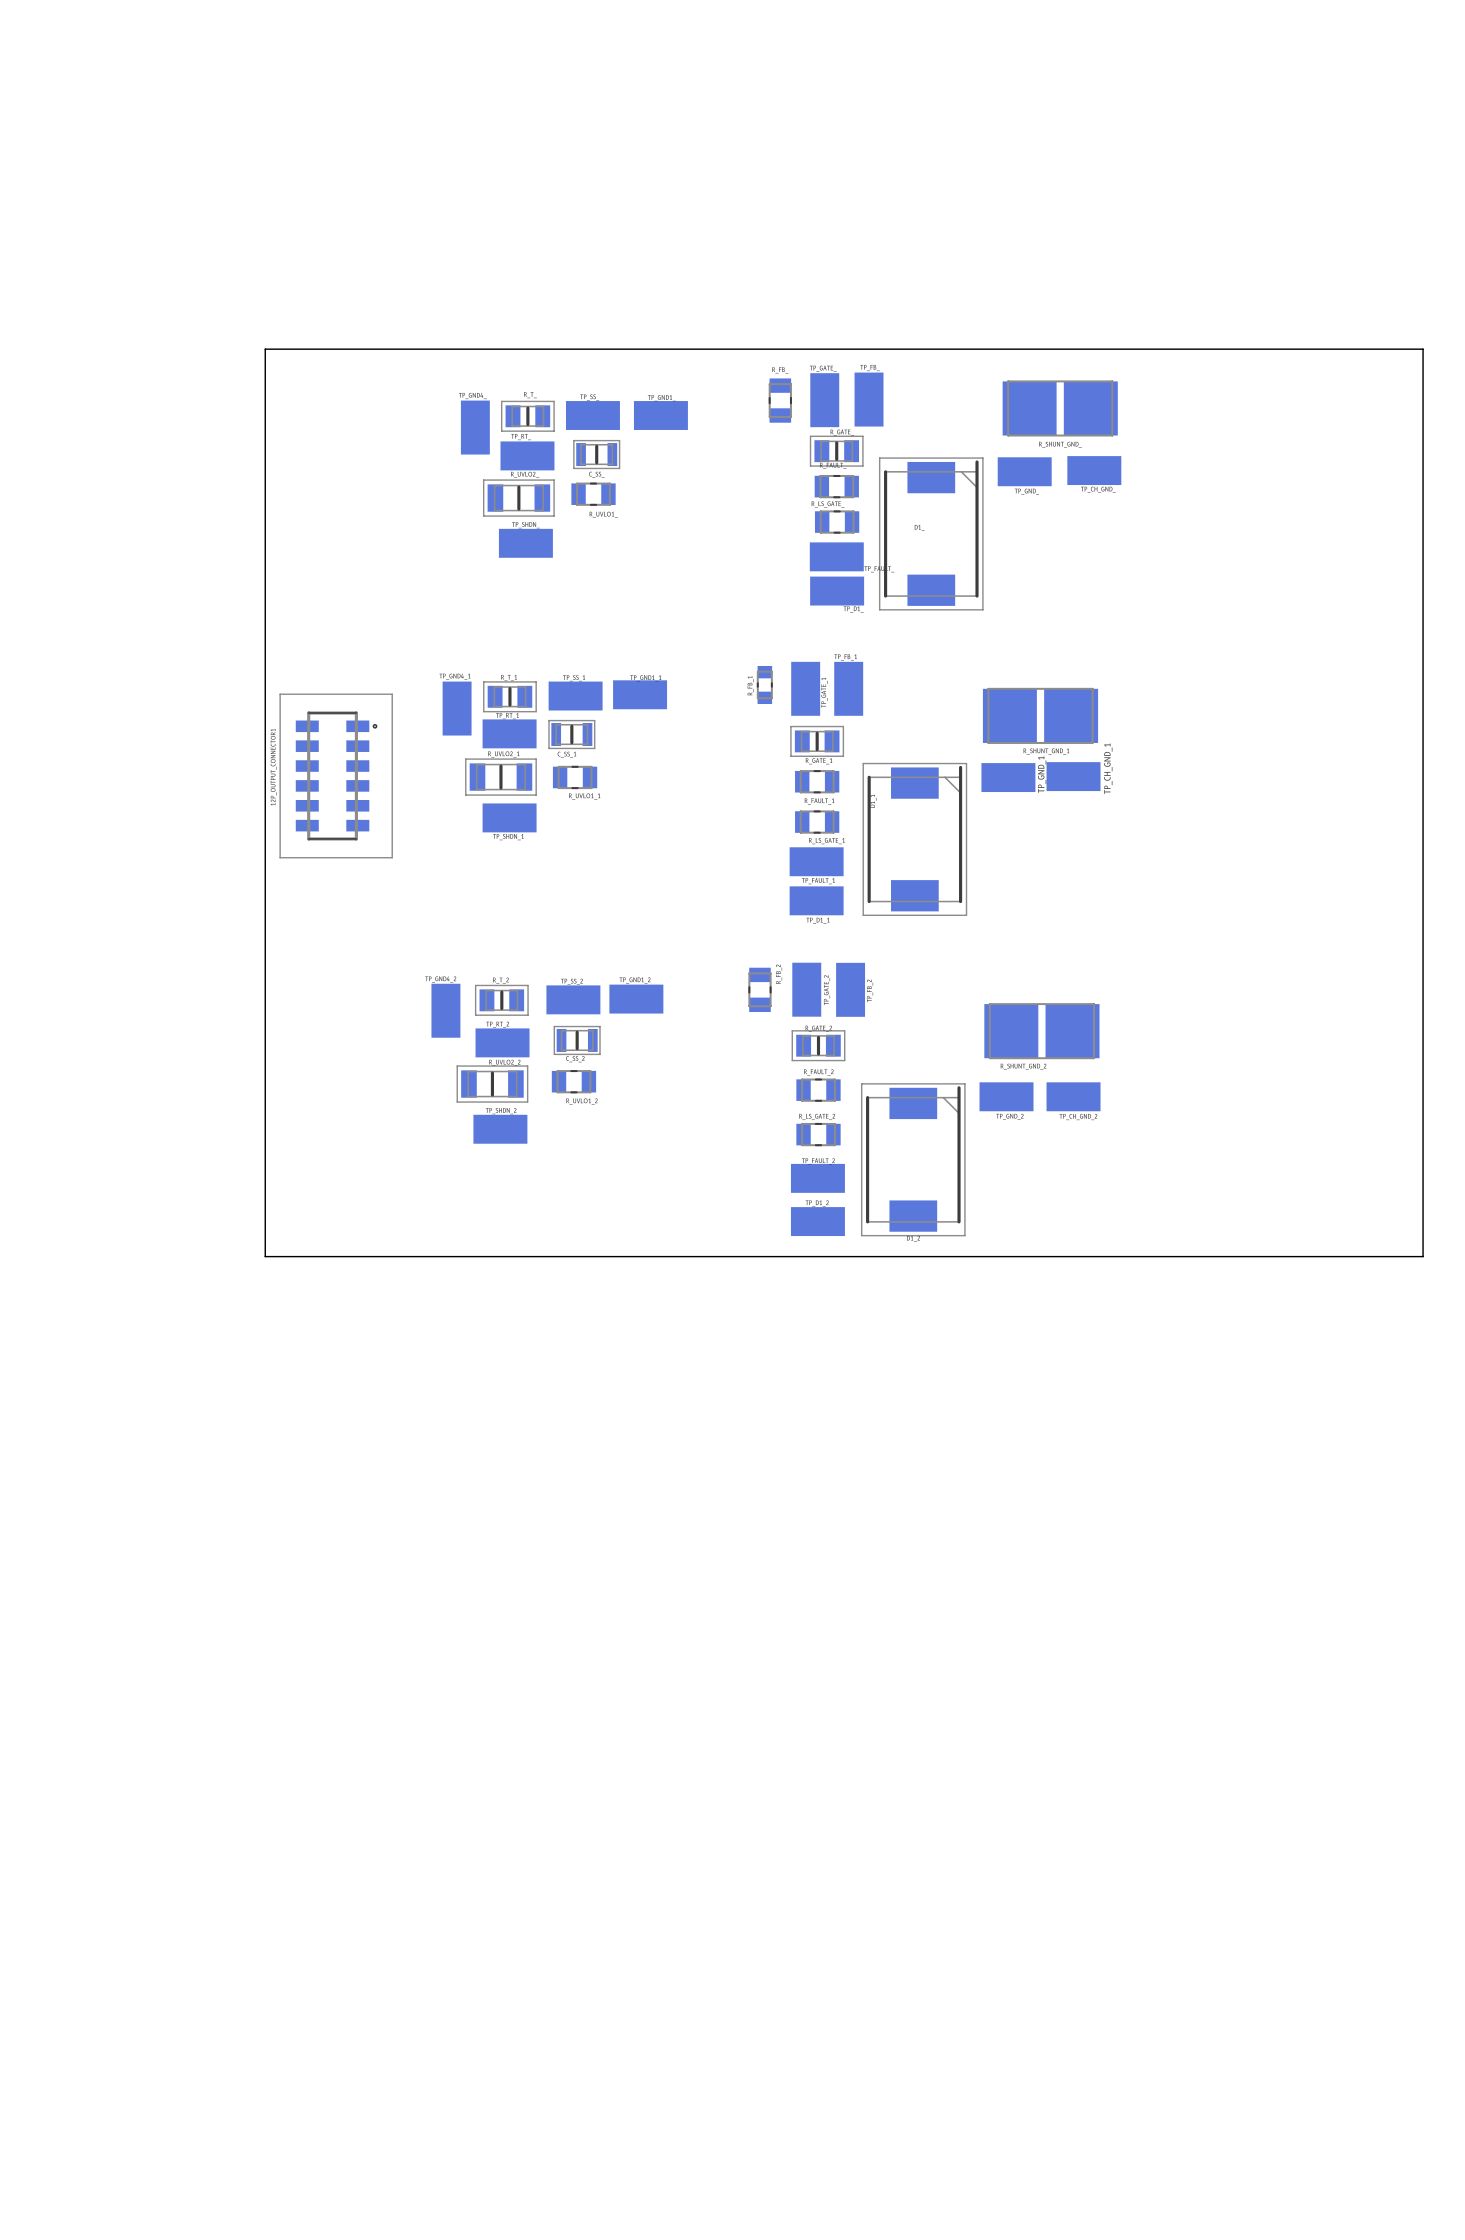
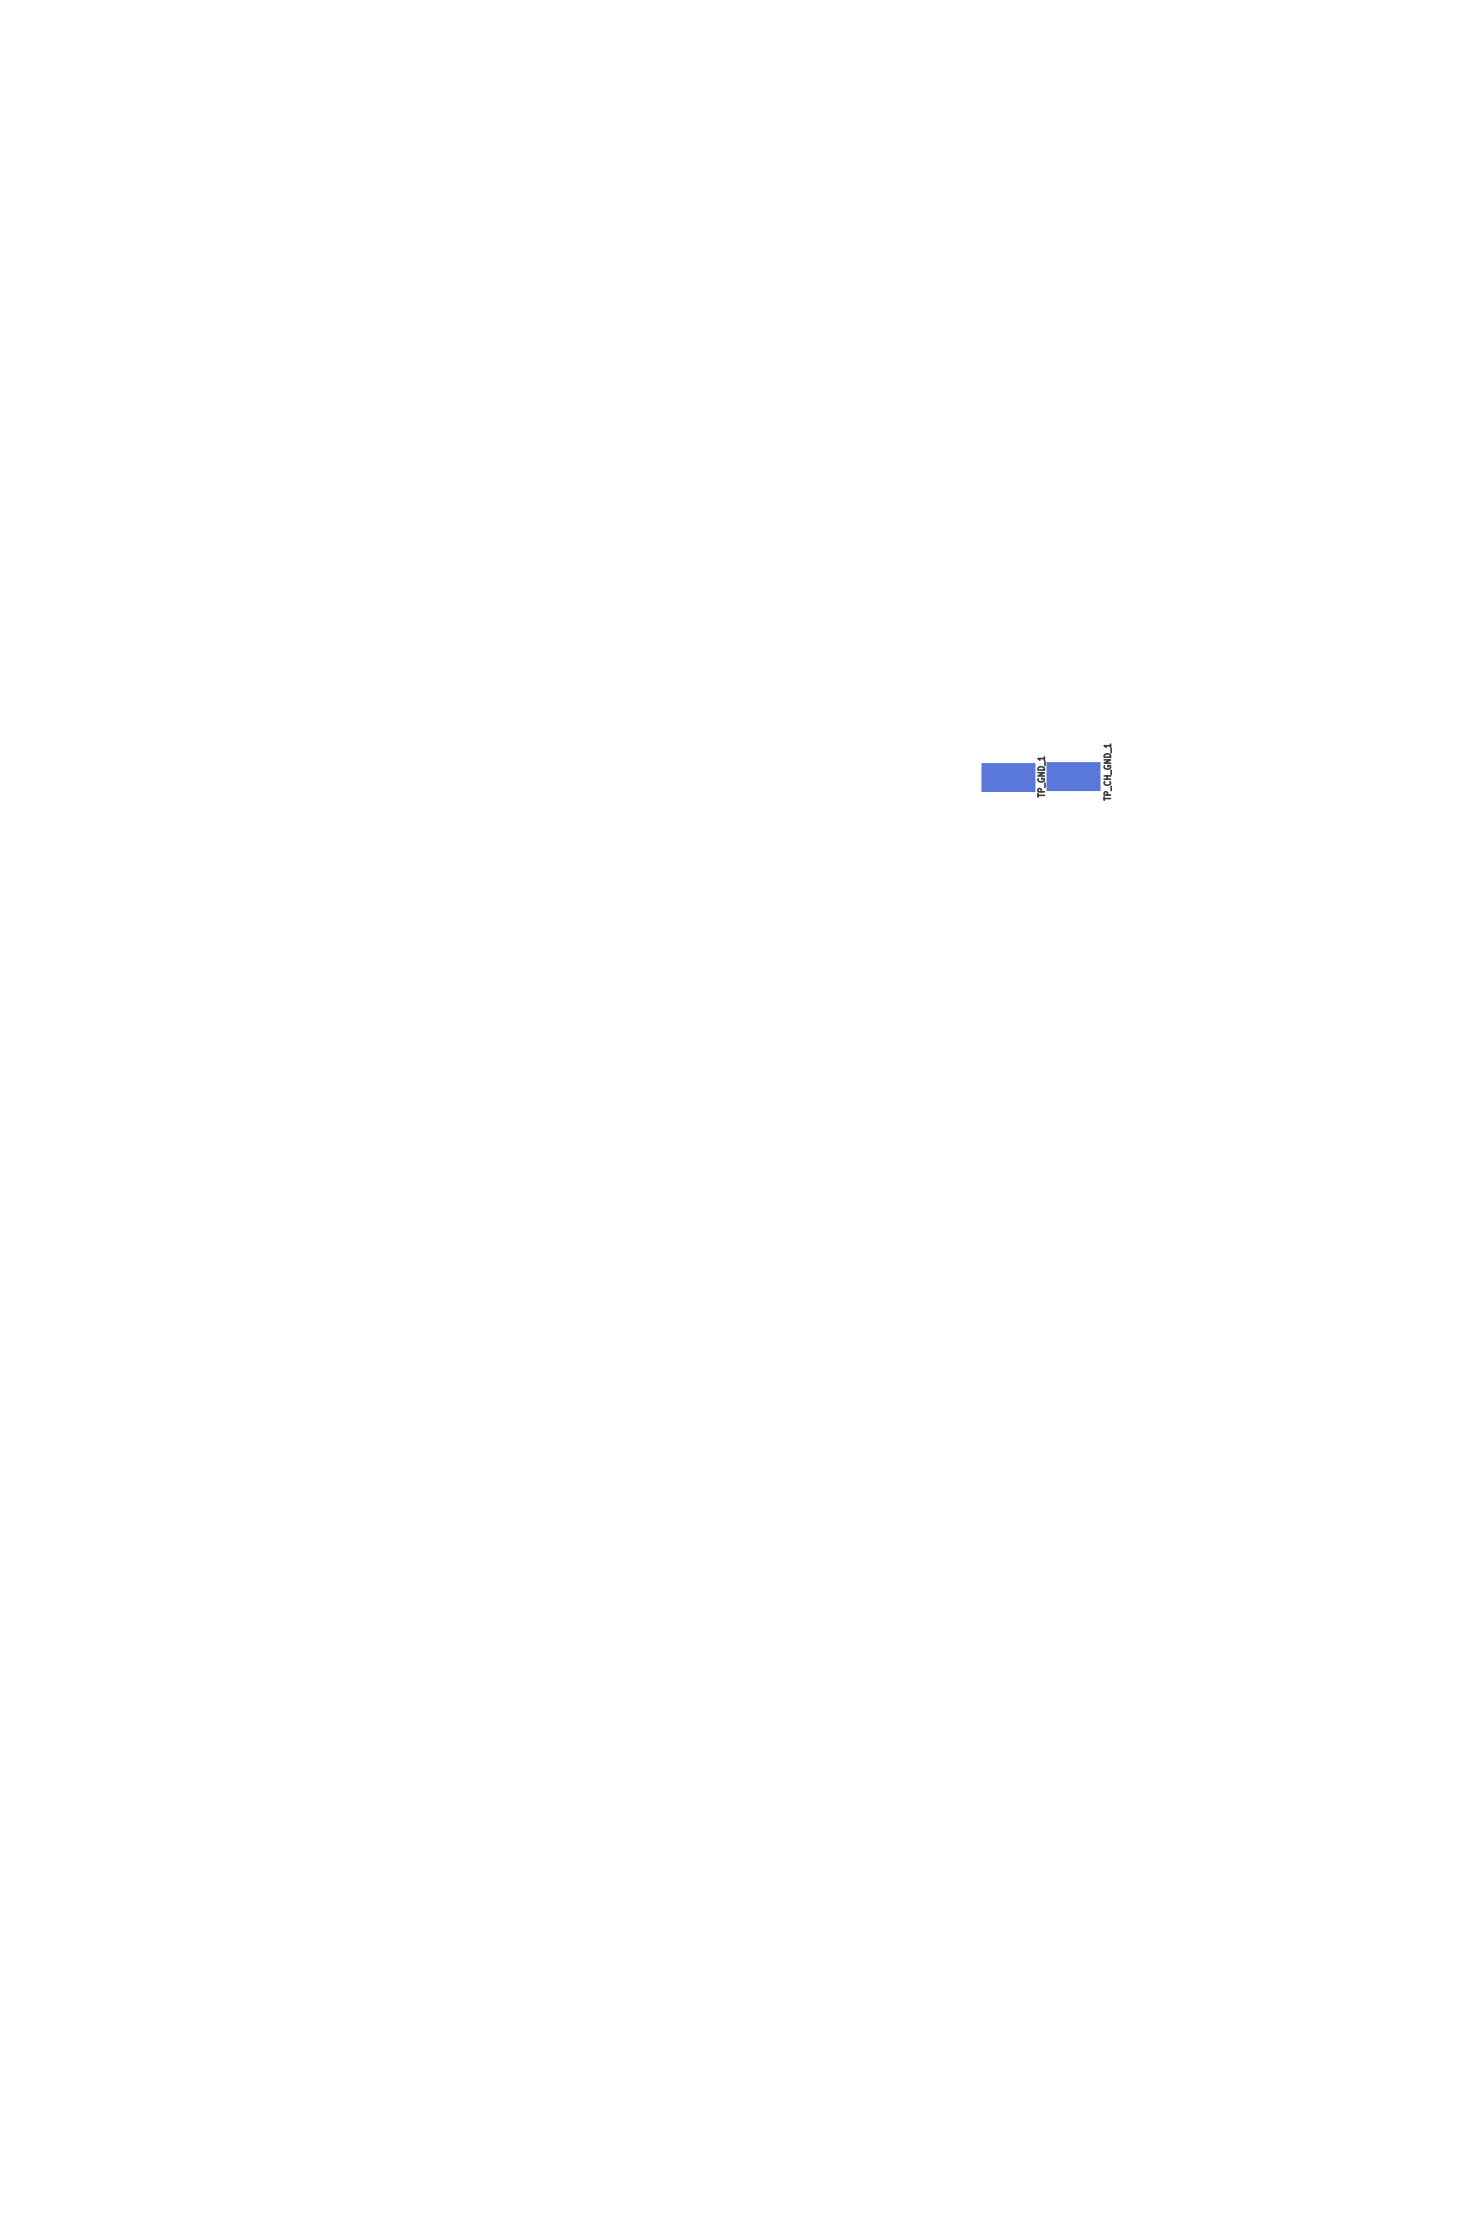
board edge: (1423, 349) (265, 349) (265, 1256) (1423, 1256) (1423, 349) -> none
part: (869, 399) -> none
part: (780, 400) -> none
part: (824, 400) -> none
part: (1060, 408) -> none
part: (592, 415) -> none
part: (660, 415) -> none
part: (527, 416) -> none
part: (475, 427) -> none
part: (836, 451) -> none
part: (596, 454) -> none
part: (527, 455) -> none
part: (1094, 470) -> none
part: (1024, 471) -> none
part: (836, 486) -> none
part: (593, 494) -> none
part: (518, 498) -> none
part: (837, 522) -> none
part: (931, 533) -> none
part: (525, 543) -> none
part: (836, 556) -> none
part: (837, 591) -> none
part: (764, 684) -> none
part: (805, 688) -> none
part: (848, 688) -> none
part: (640, 694) -> none
part: (509, 696) -> none
part: (575, 696) -> none
part: (457, 708) -> none
part: (1040, 715) -> none
part: (509, 733) -> none
part: (571, 734) -> none
part: (817, 741) -> none
part: (336, 775) -> none
part: (500, 777) -> none
part: (575, 777) -> none
part: (817, 781) -> none
part: (509, 817) -> none
part: (817, 822) -> none
part: (914, 839) -> none
part: (816, 861) -> none
part: (816, 900) -> none
part: (759, 989) -> none
part: (806, 989) -> none
part: (850, 989) -> none
part: (573, 999) -> none
part: (636, 999) -> none
part: (501, 1000) -> none
part: (445, 1010) -> none
part: (1041, 1031) -> none
part: (577, 1040) -> none
part: (502, 1042) -> none
part: (818, 1045) -> none
part: (573, 1081) -> none
part: (492, 1084) -> none
part: (818, 1090) -> none
part: (1006, 1096) -> none
part: (1073, 1096) -> none
part: (500, 1129) -> none
part: (818, 1134) -> none
part: (913, 1159) -> none
part: (817, 1178) -> none
part: (817, 1221) -> none

